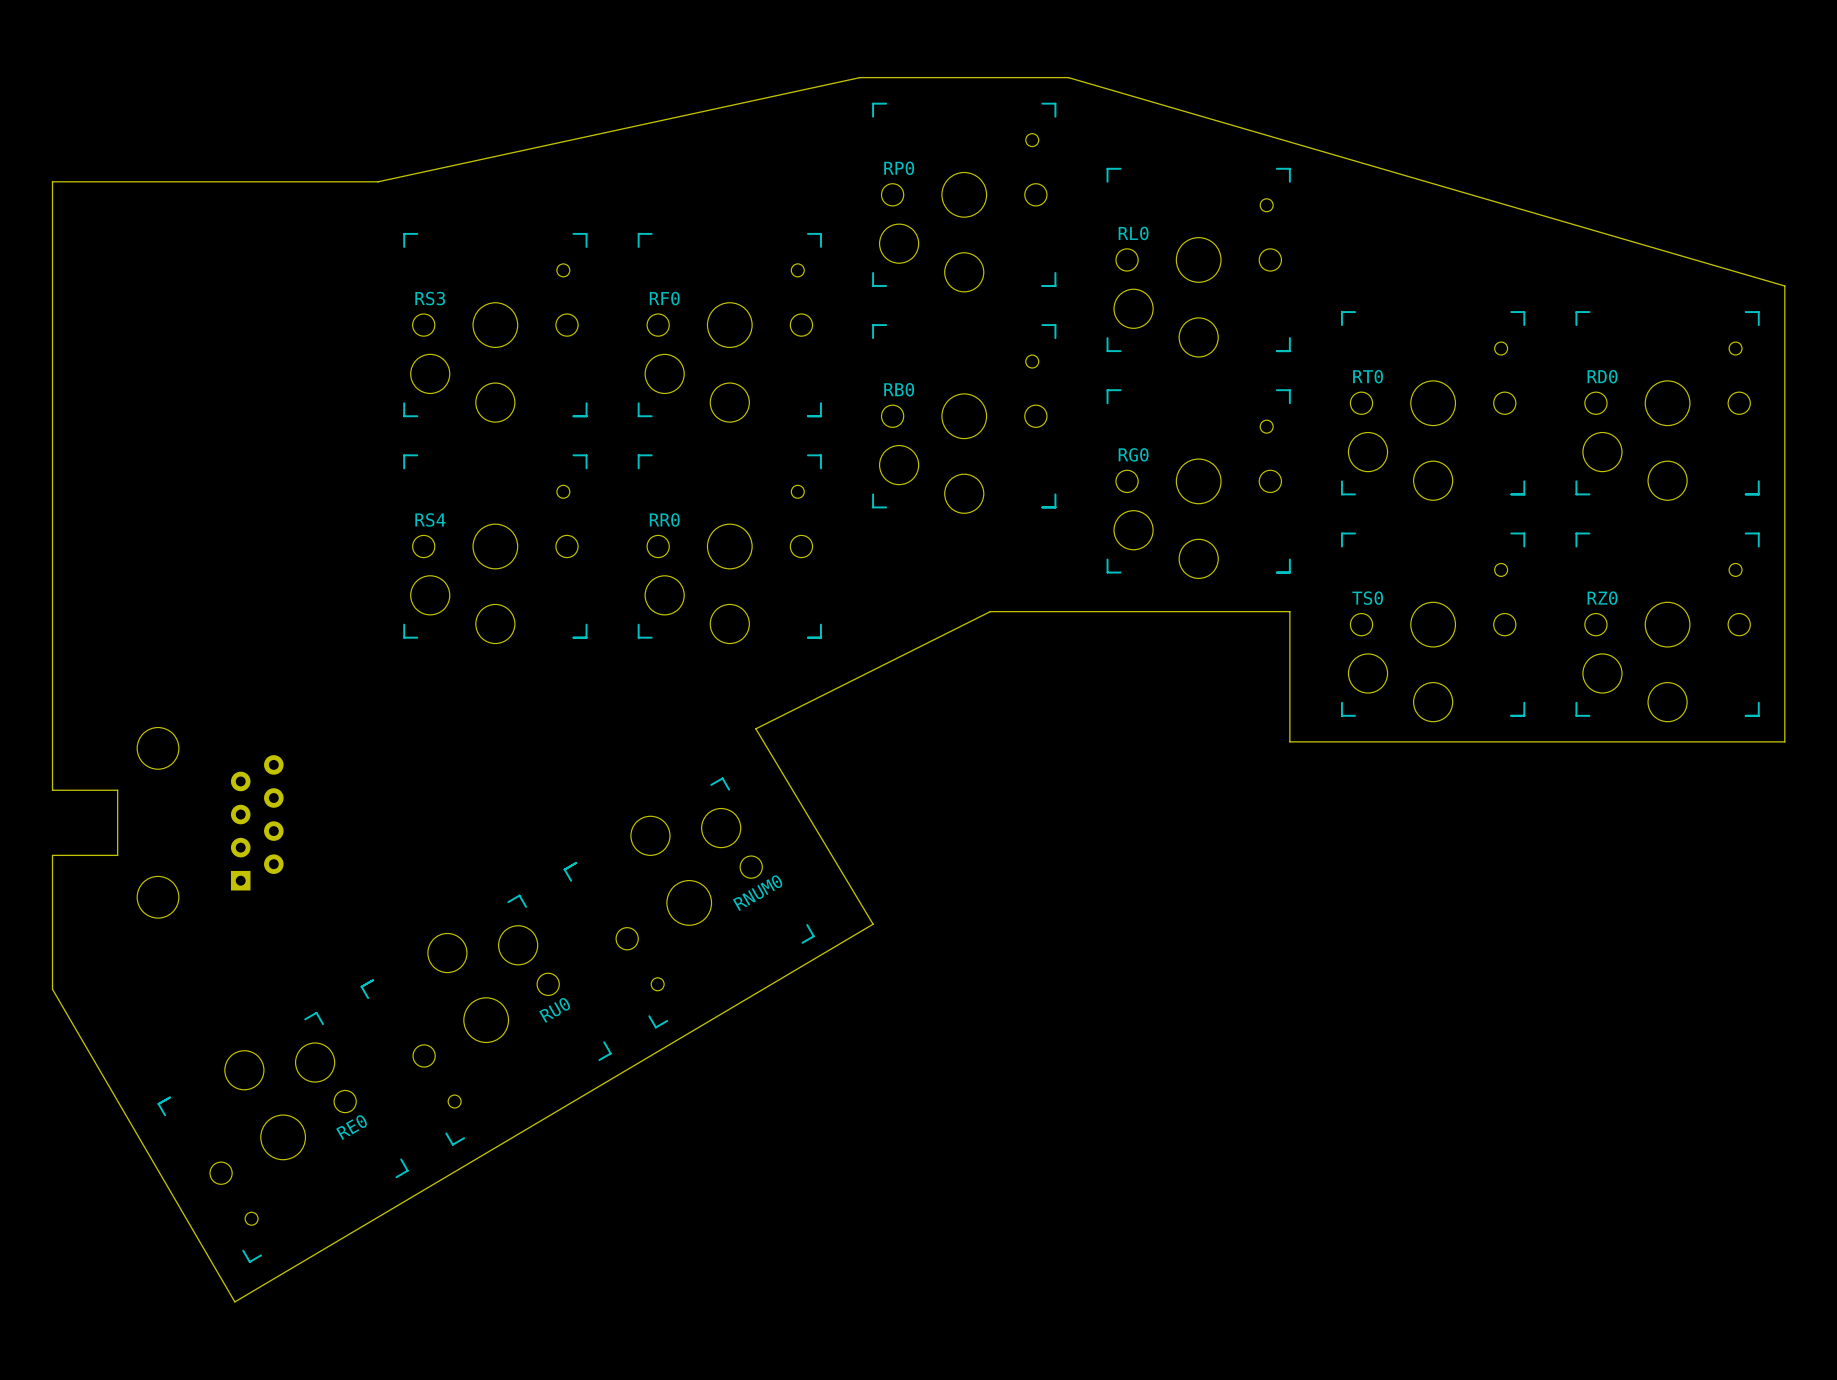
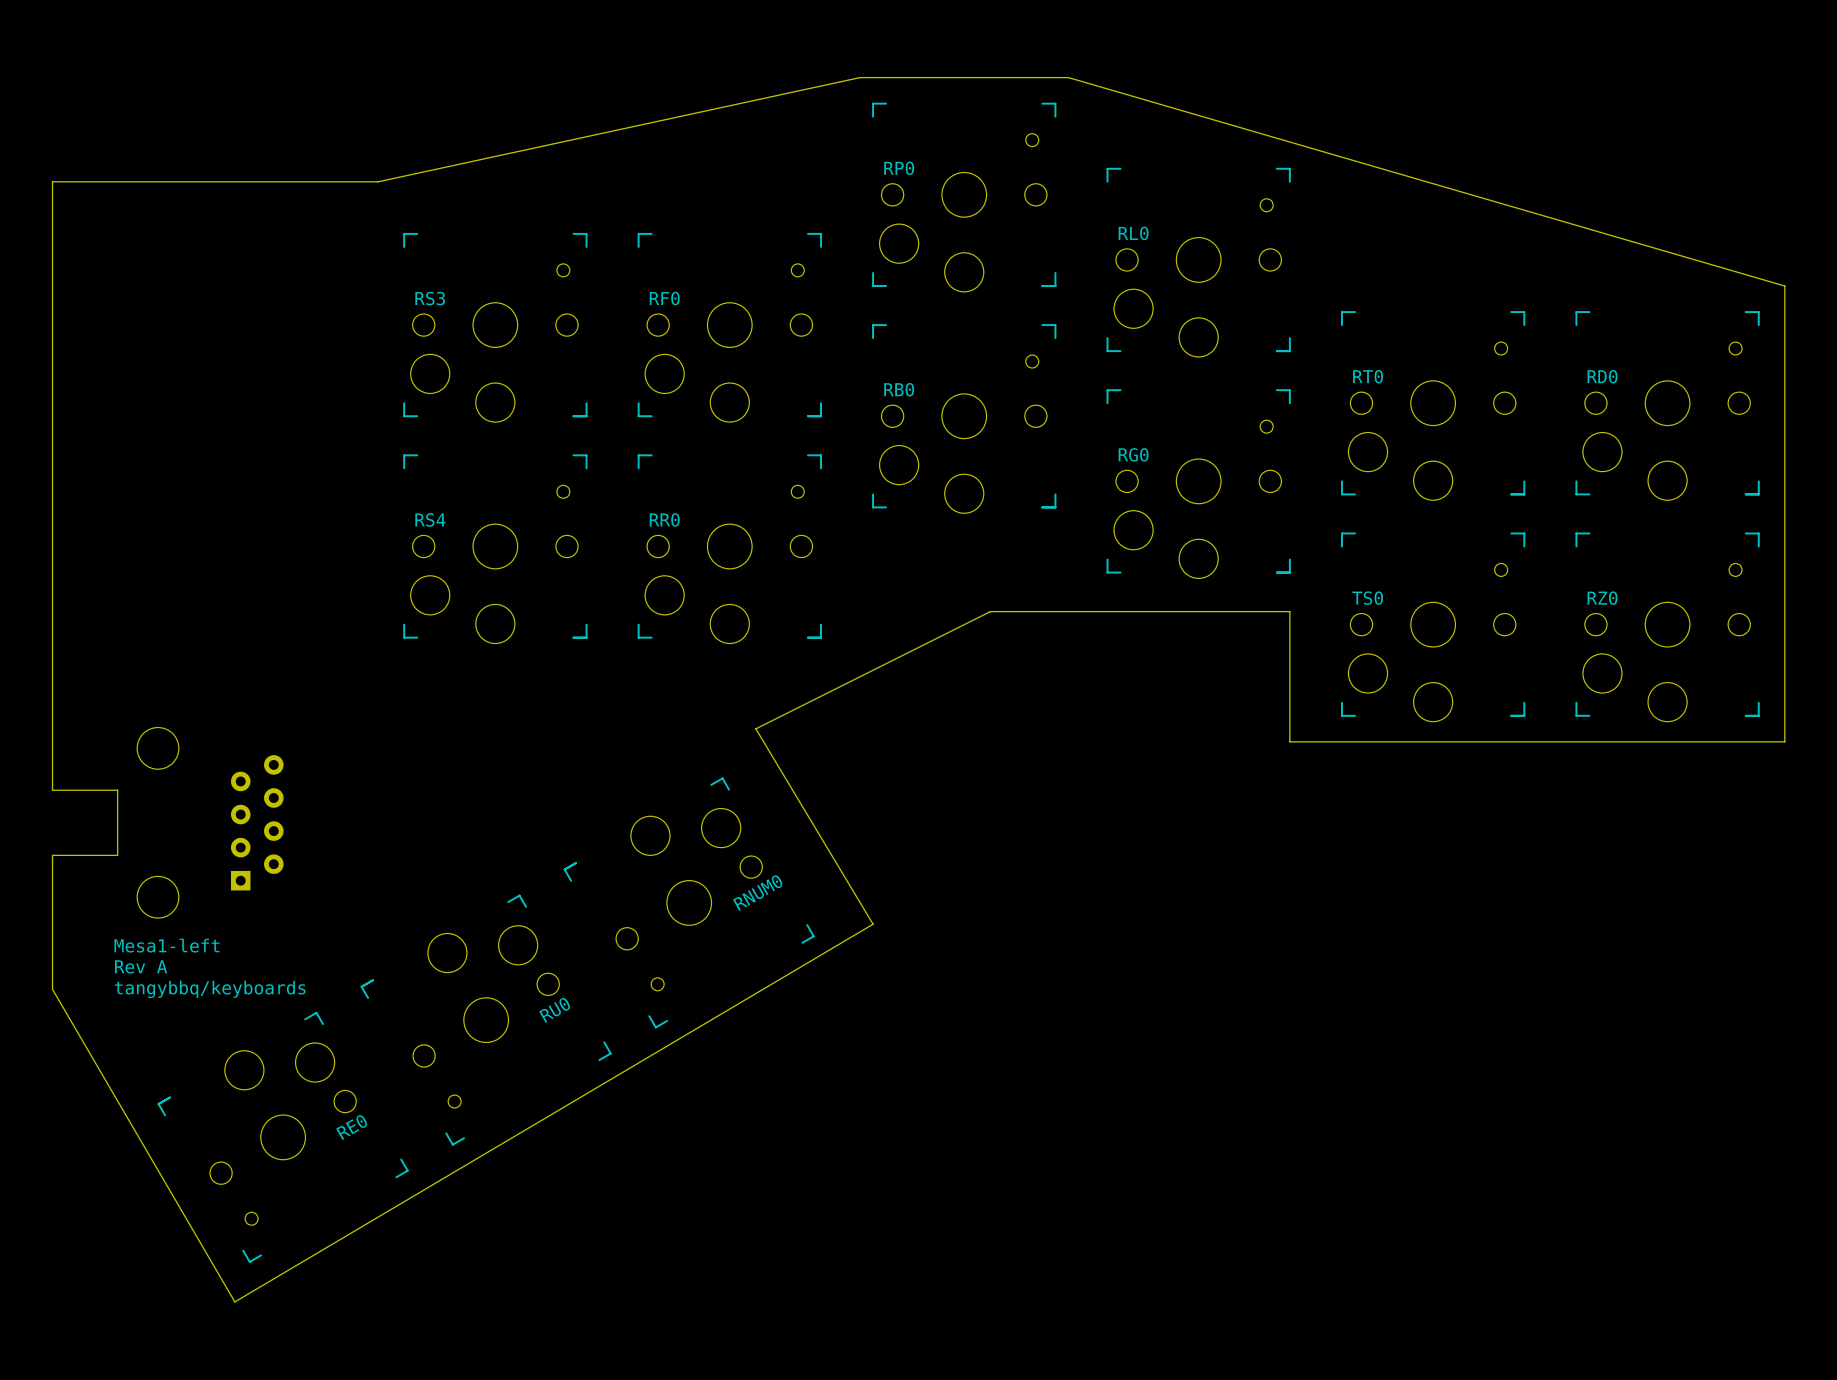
text: none -> Mesa1-left (167, 945)
text: none -> Rev A (141, 966)
text: none -> tangybbq/keyboards (210, 989)

